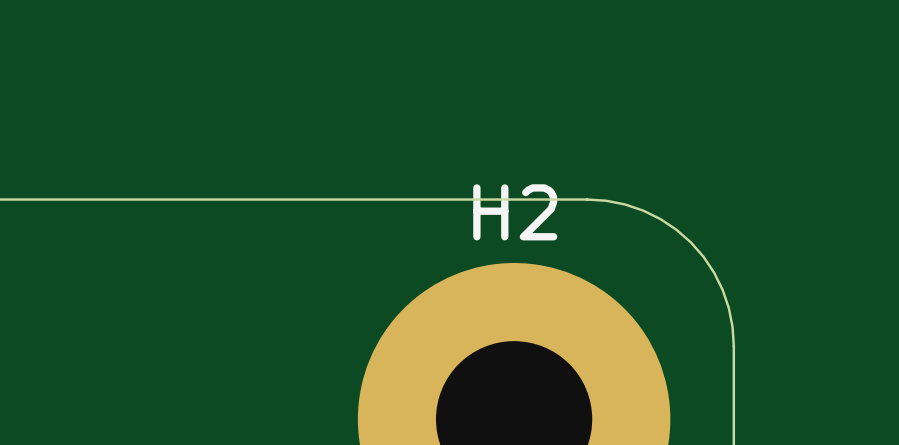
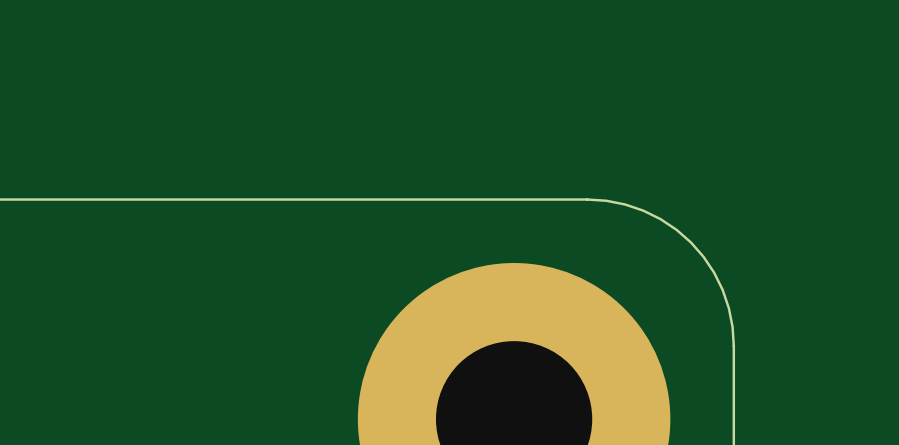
H2 name: H2 (515, 212) -> none

